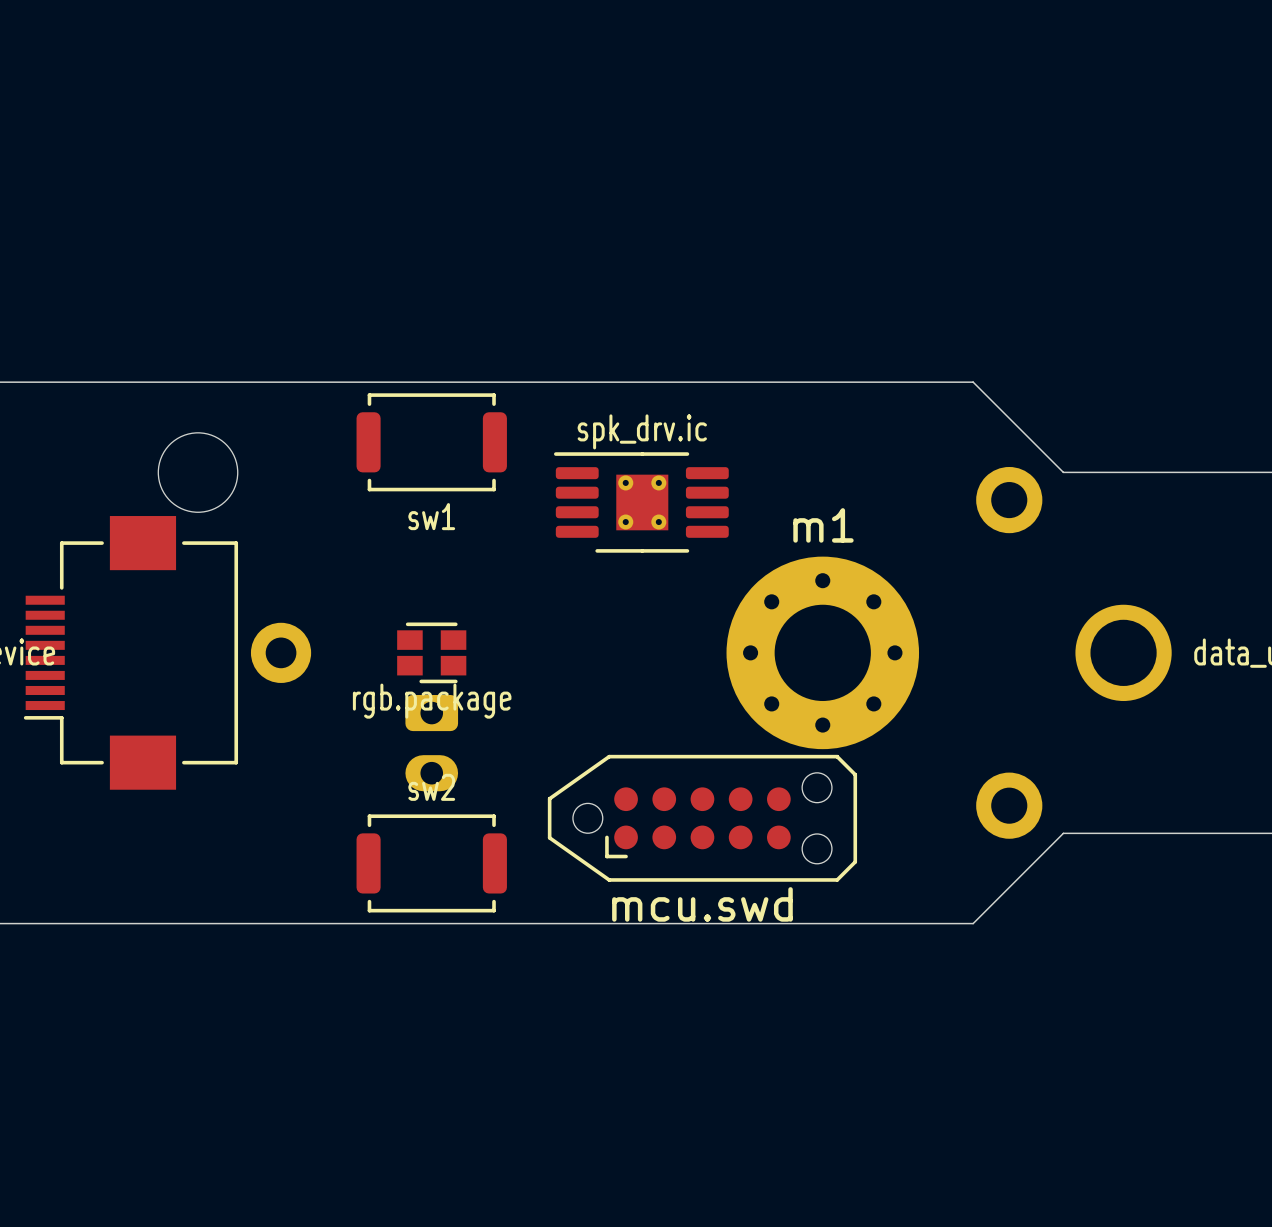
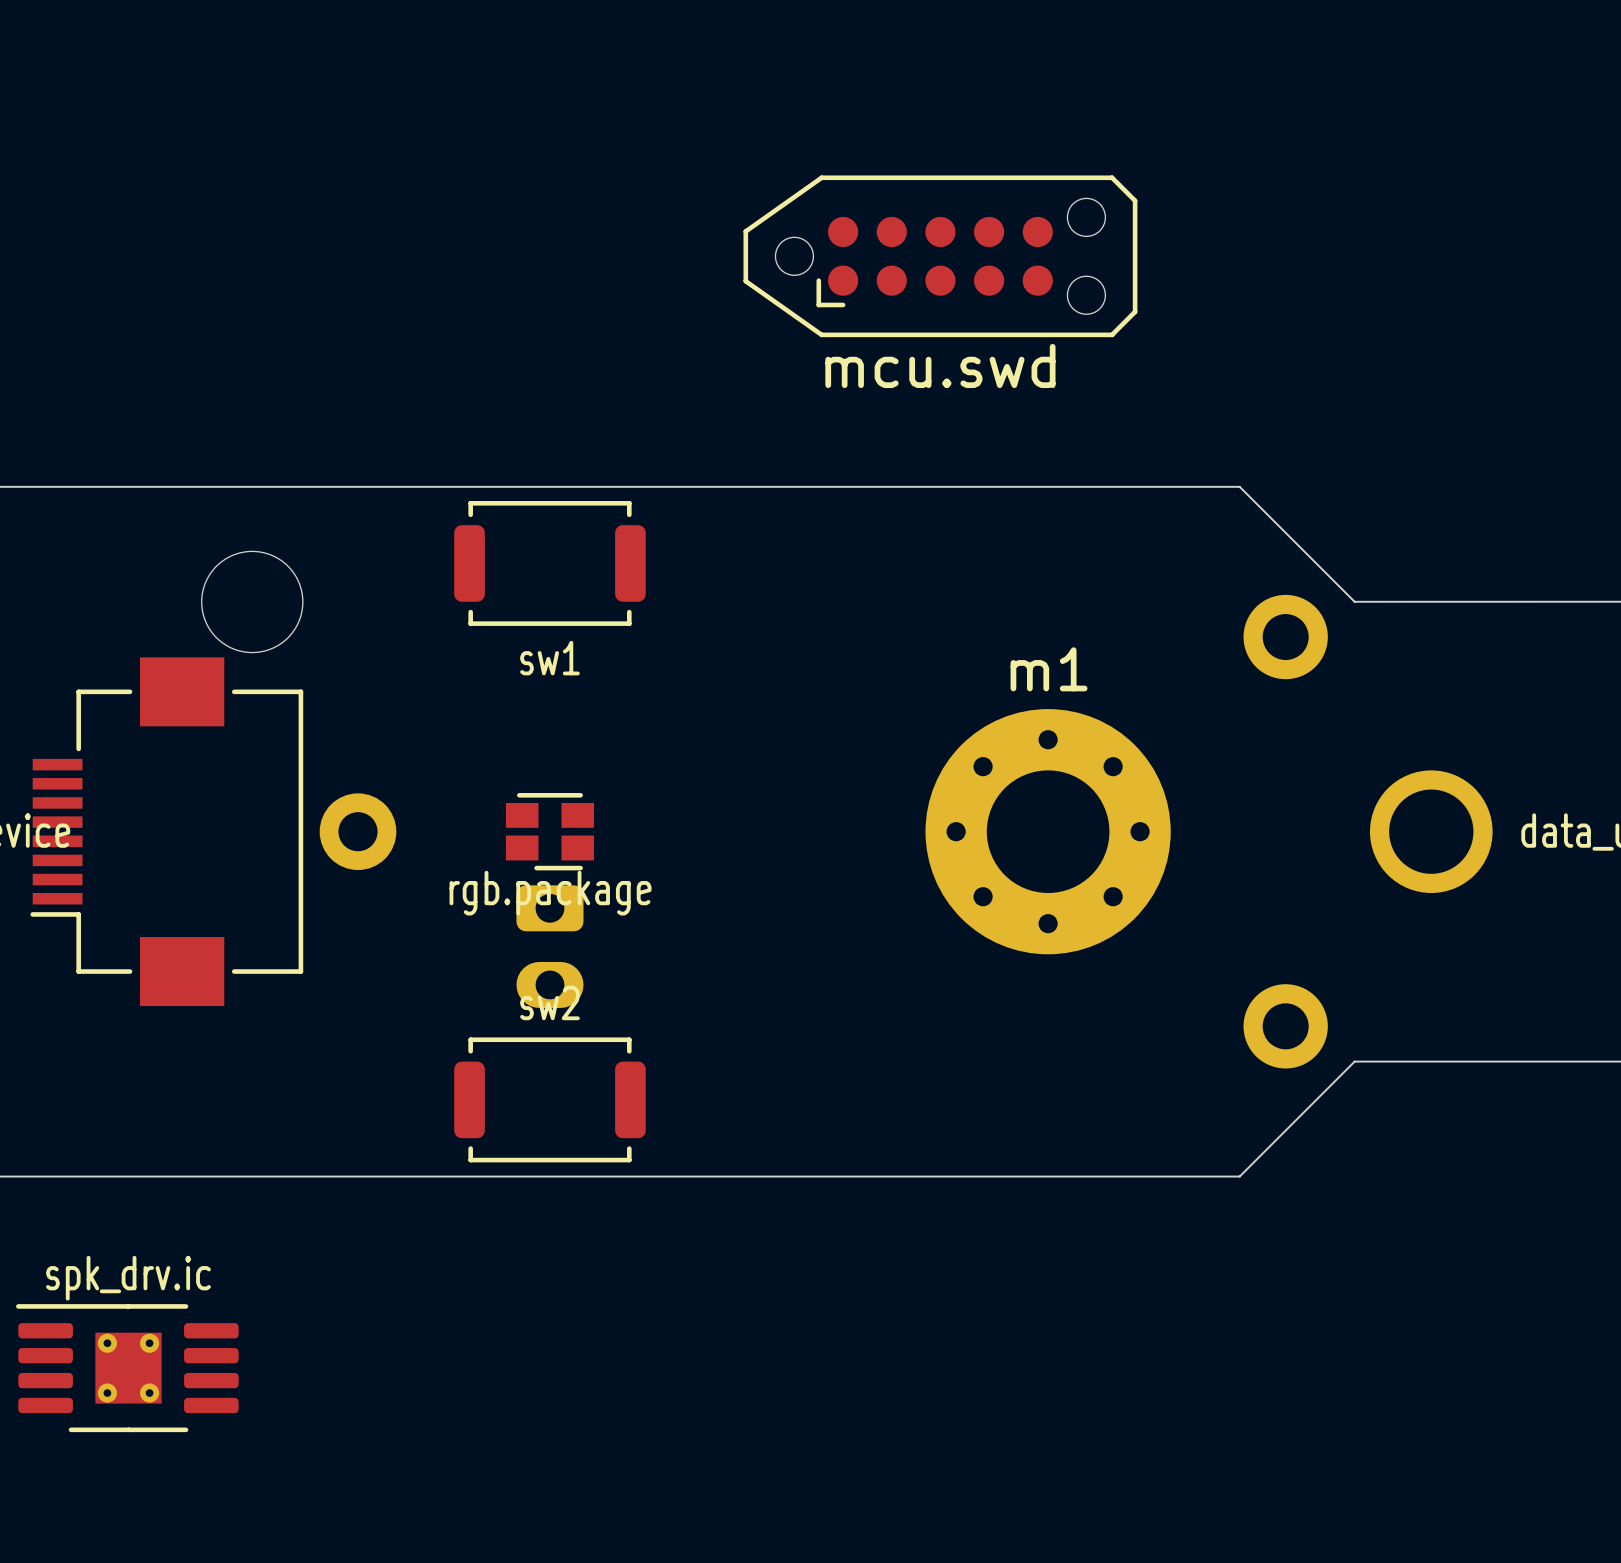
spk_drv.ic: (641, 502) -> none
mcu.swd position: (702, 818) -> (940, 256)
spk_drv.ic: none -> (127, 1368)

